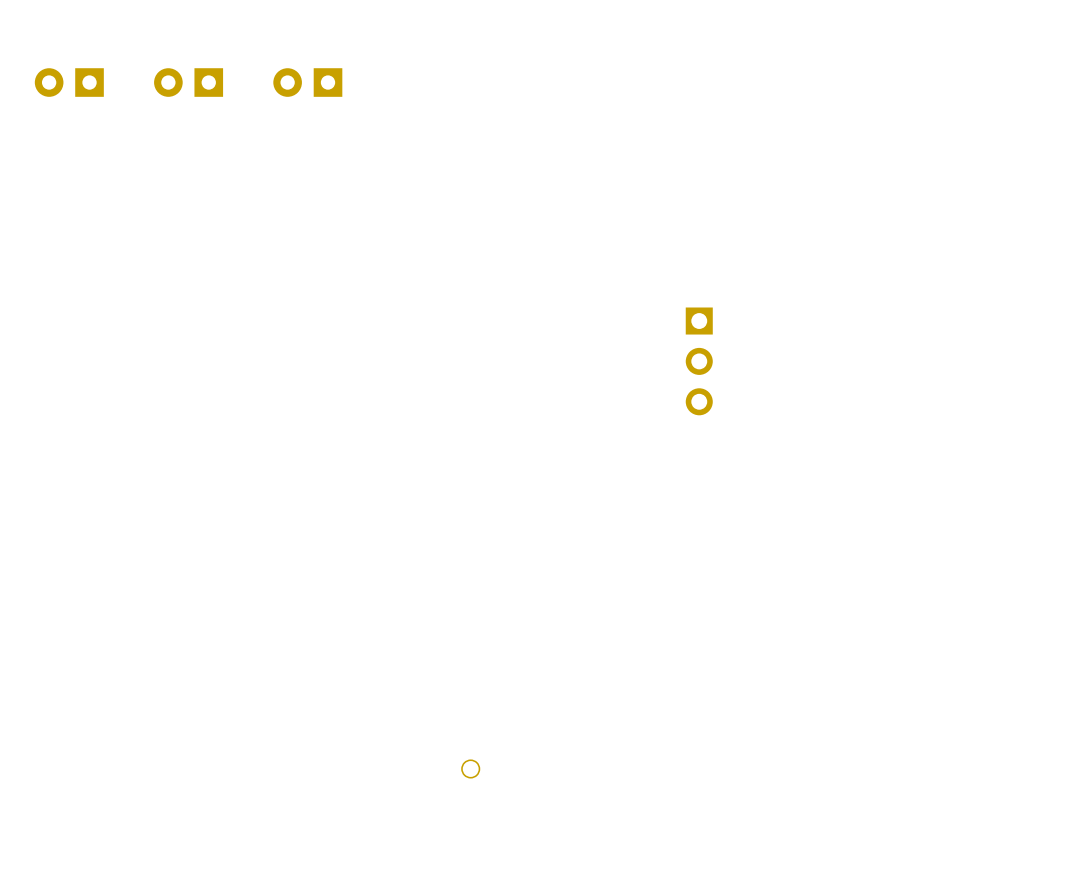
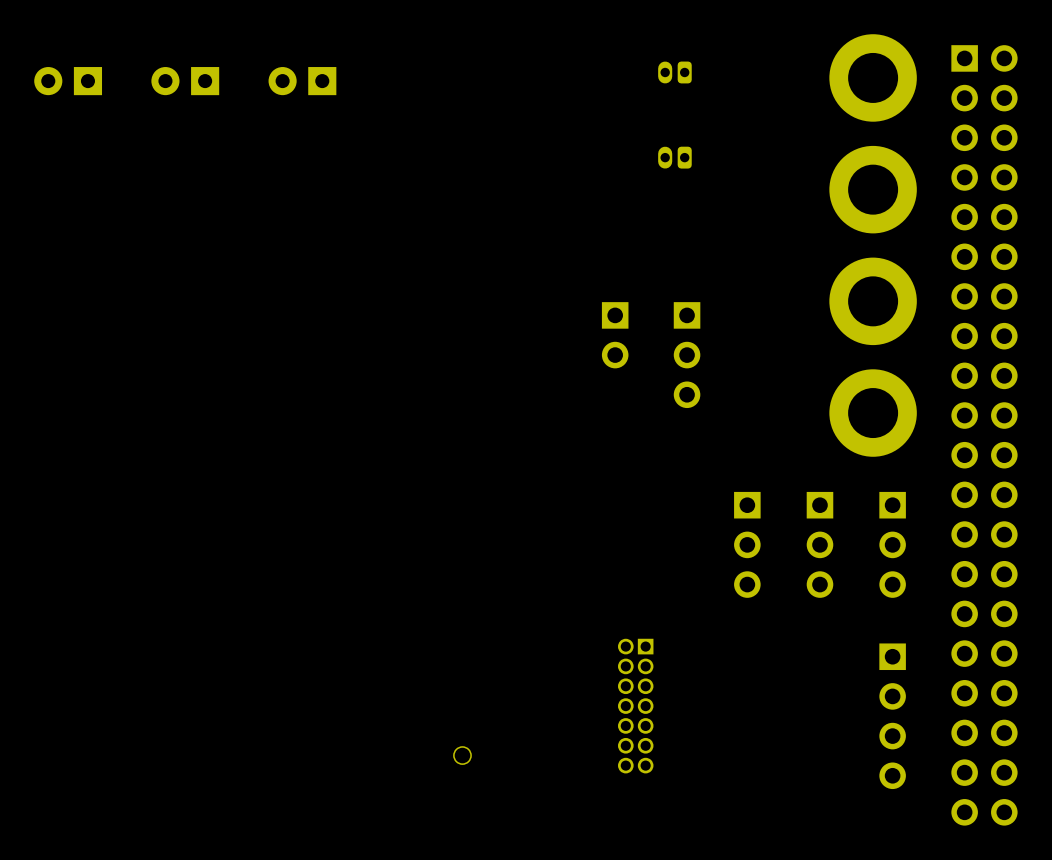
part: none -> (674, 72)
part: none -> (873, 77)
part: none -> (674, 157)
part: none -> (873, 189)
part: none -> (873, 301)
part: none -> (615, 335)
part: none -> (873, 413)
part: none -> (984, 435)
part: none -> (747, 544)
part: none -> (819, 544)
part: none -> (892, 544)
part: none -> (635, 706)
part: none -> (892, 716)

